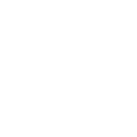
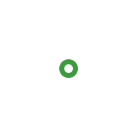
part: none -> (68, 68)

